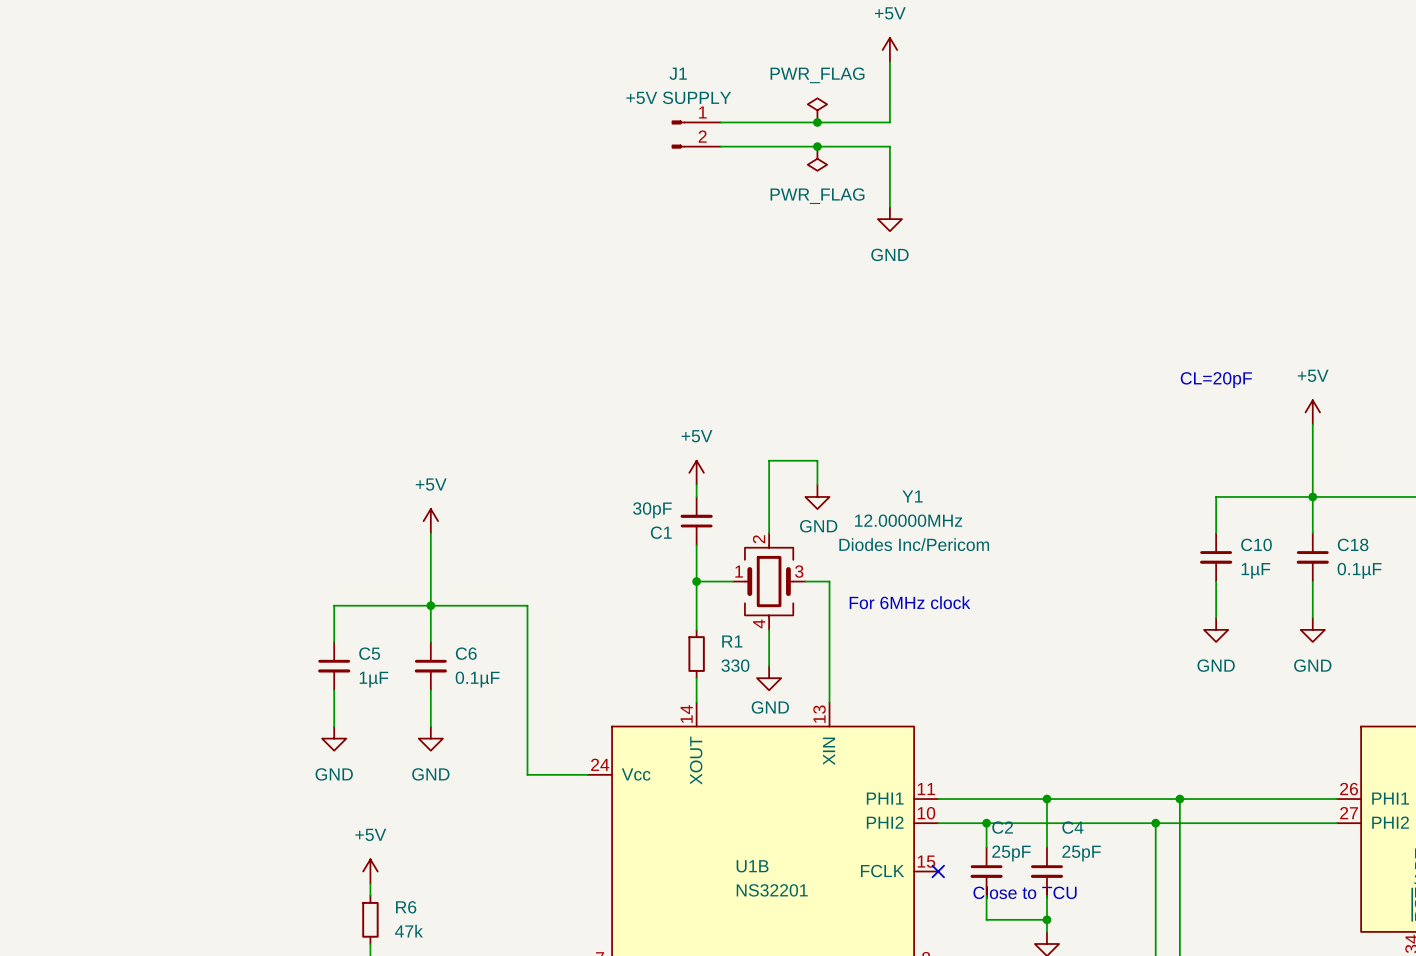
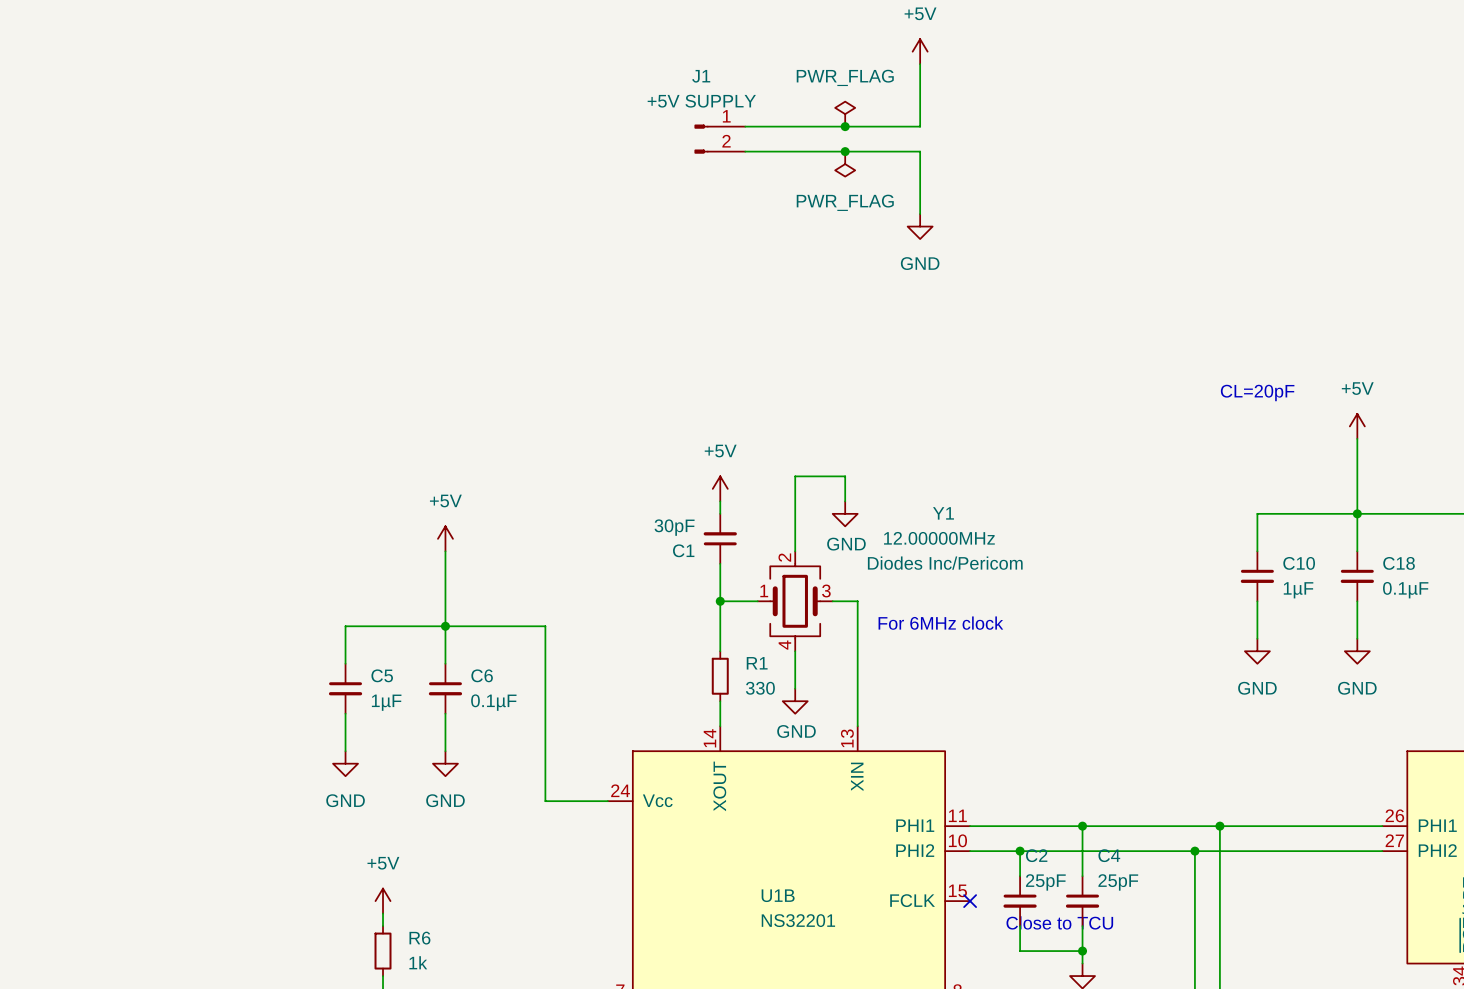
R6 value: 47k (408, 931) -> 1k (418, 962)

